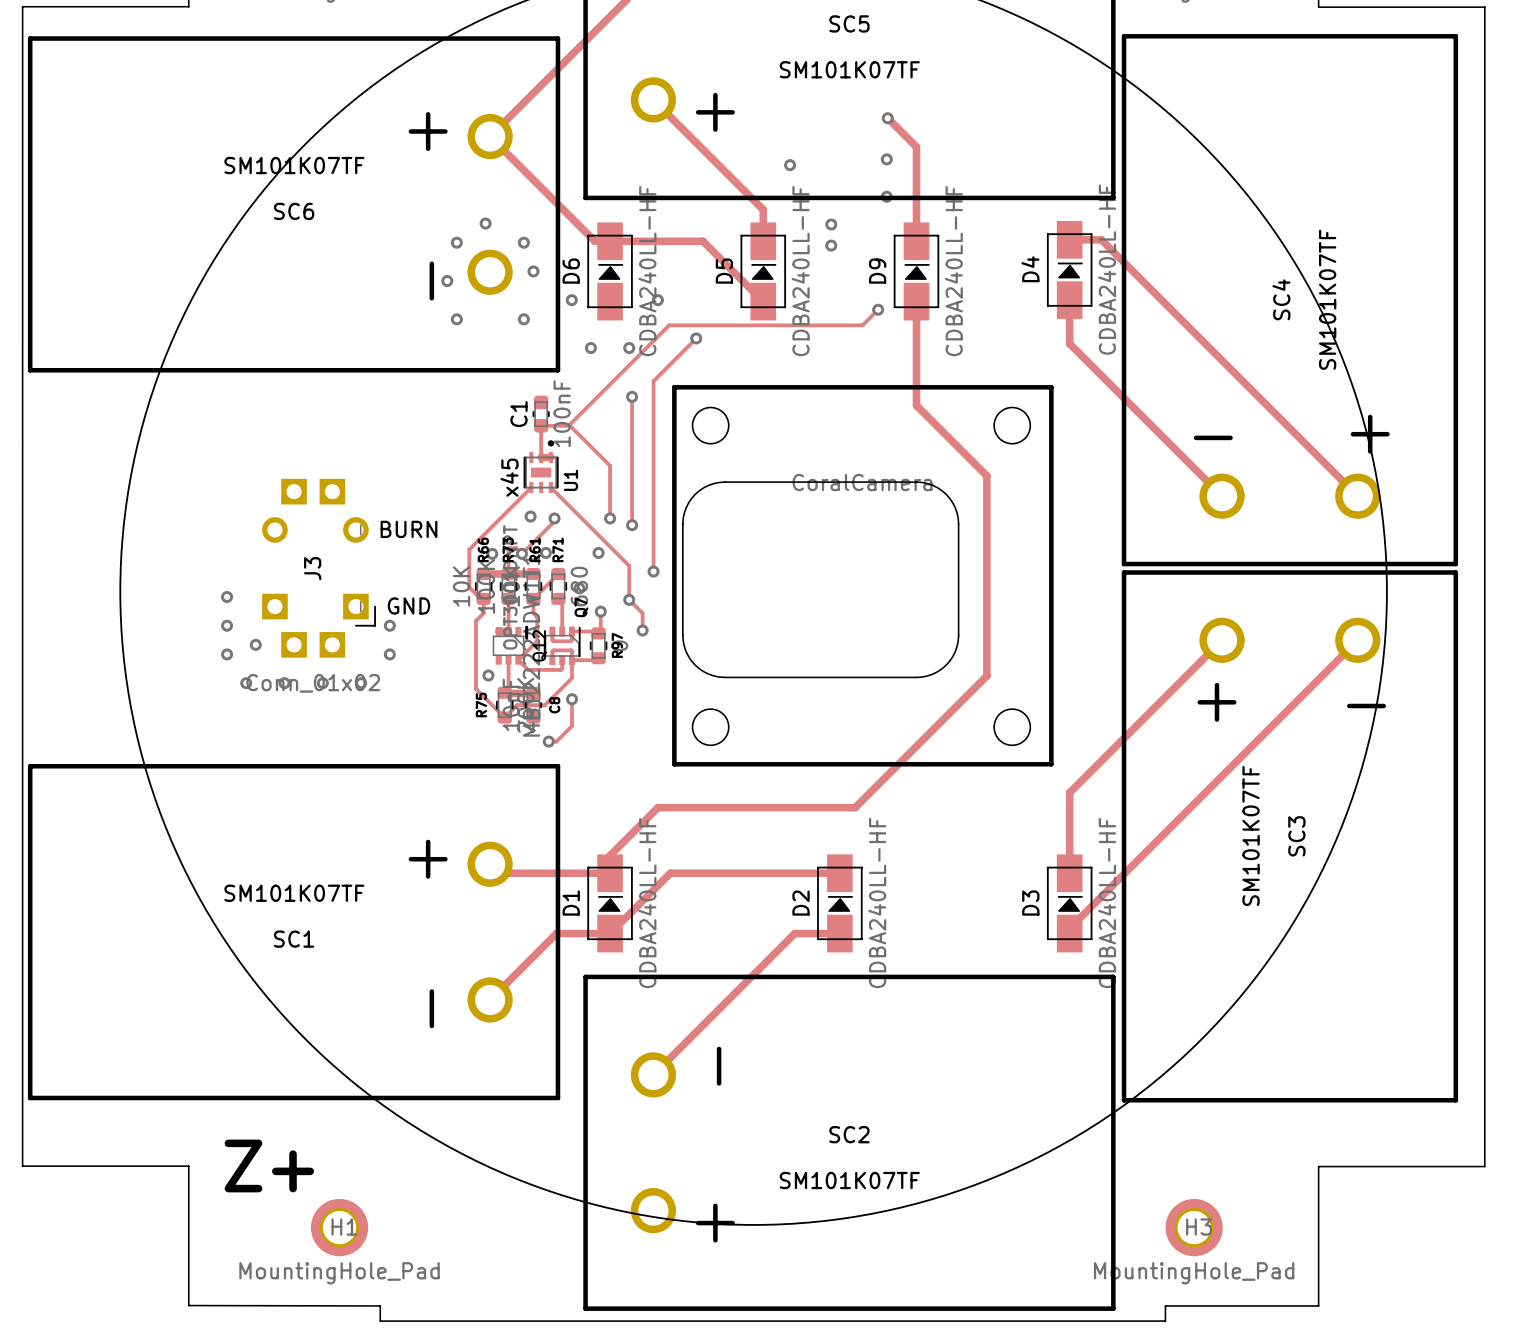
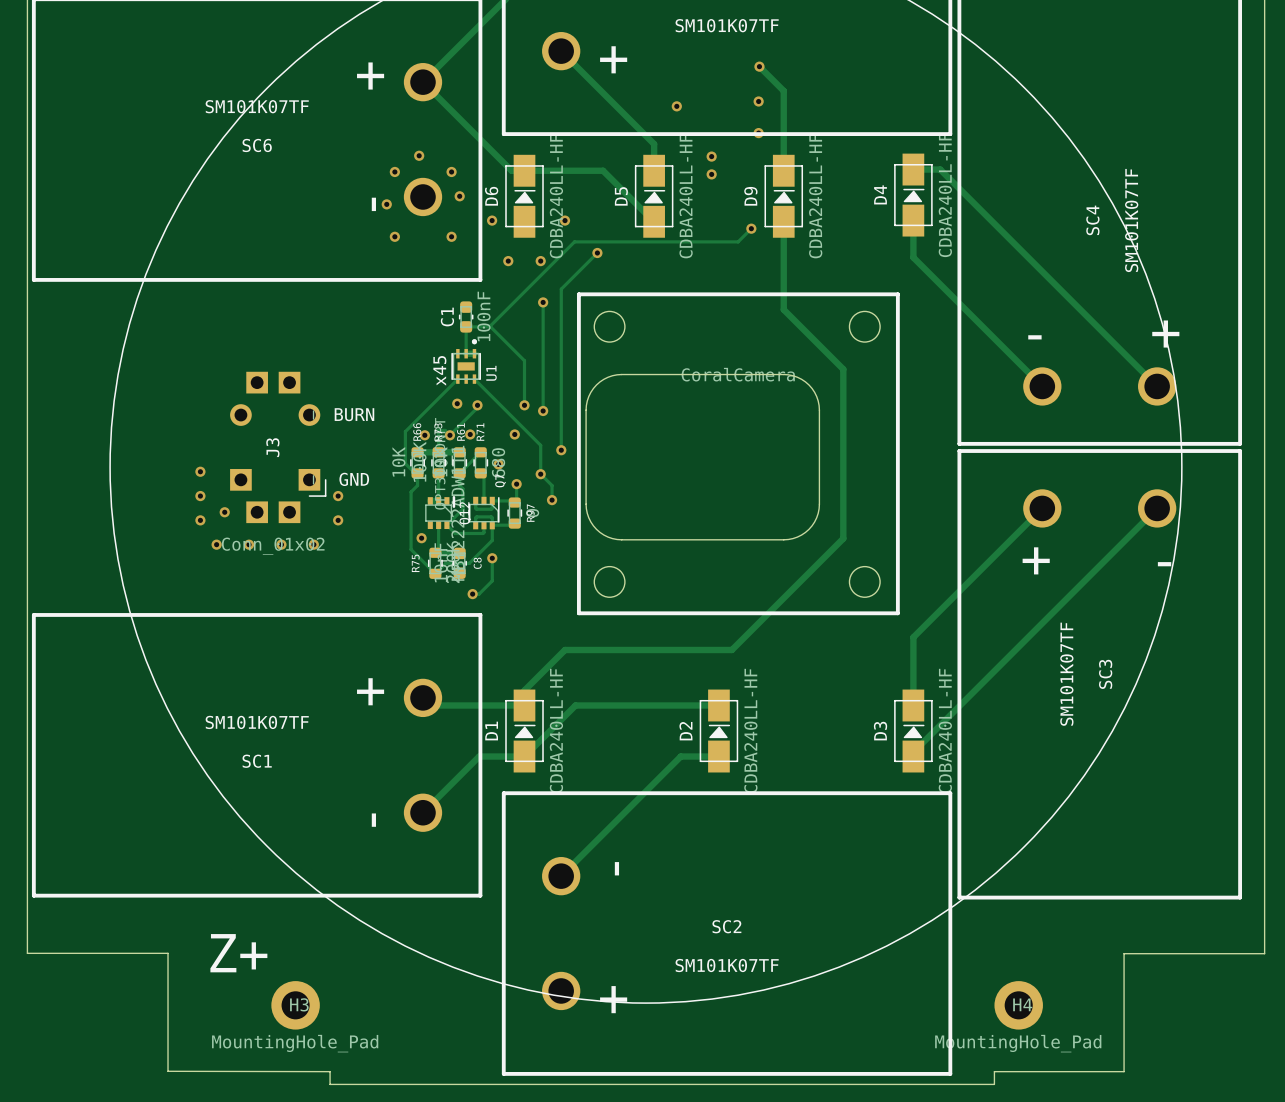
H1 name: H1 (344, 1227) -> H3 (299, 1004)
H3 name: H3 (1199, 1227) -> H4 (1022, 1004)

